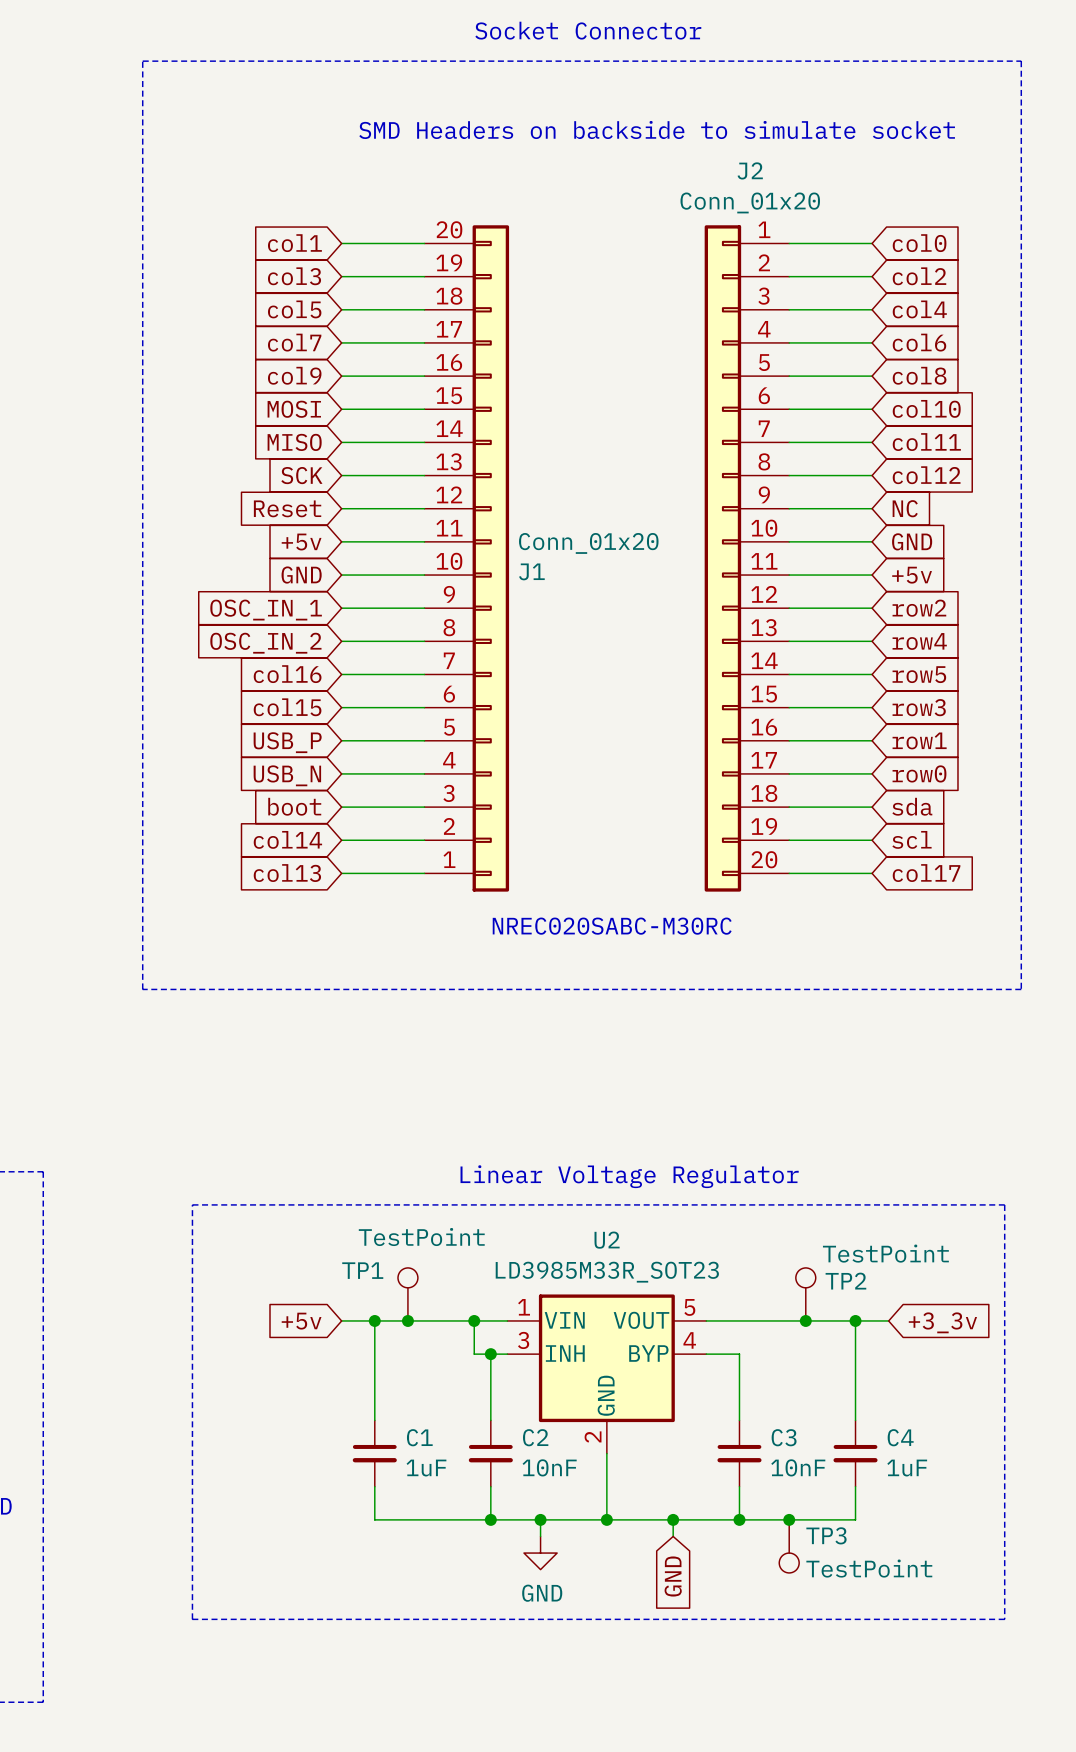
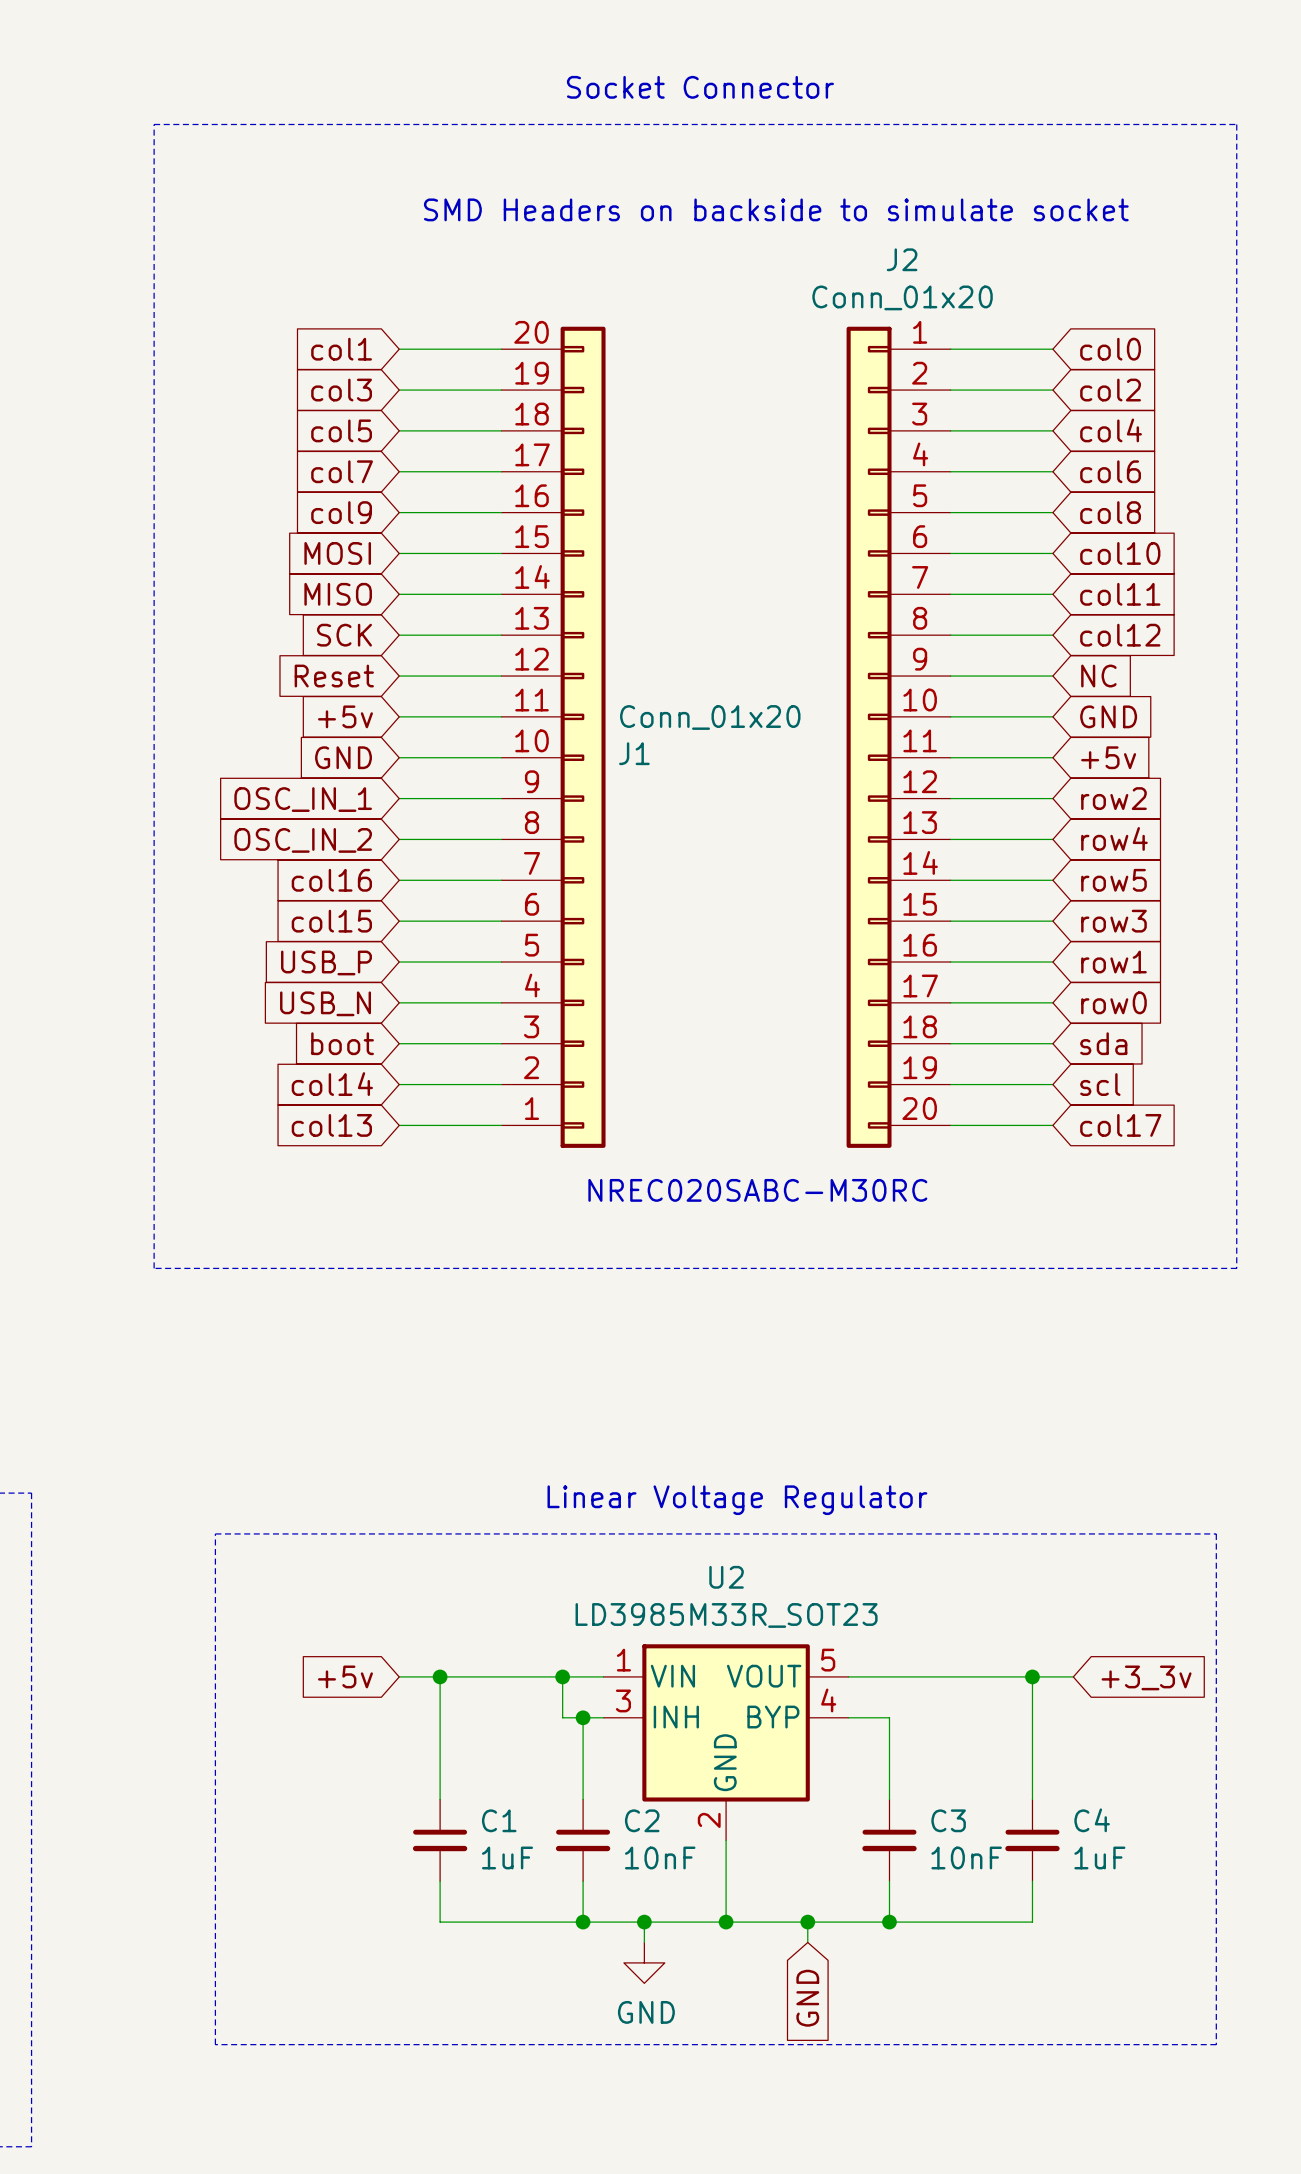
TP1: TestPoint (407, 1294) -> none
TP2: TestPoint (805, 1294) -> none
junction: (407, 1320) -> none
junction: (805, 1320) -> none
junction: (789, 1519) -> none
TP3: TestPoint (789, 1546) -> none

